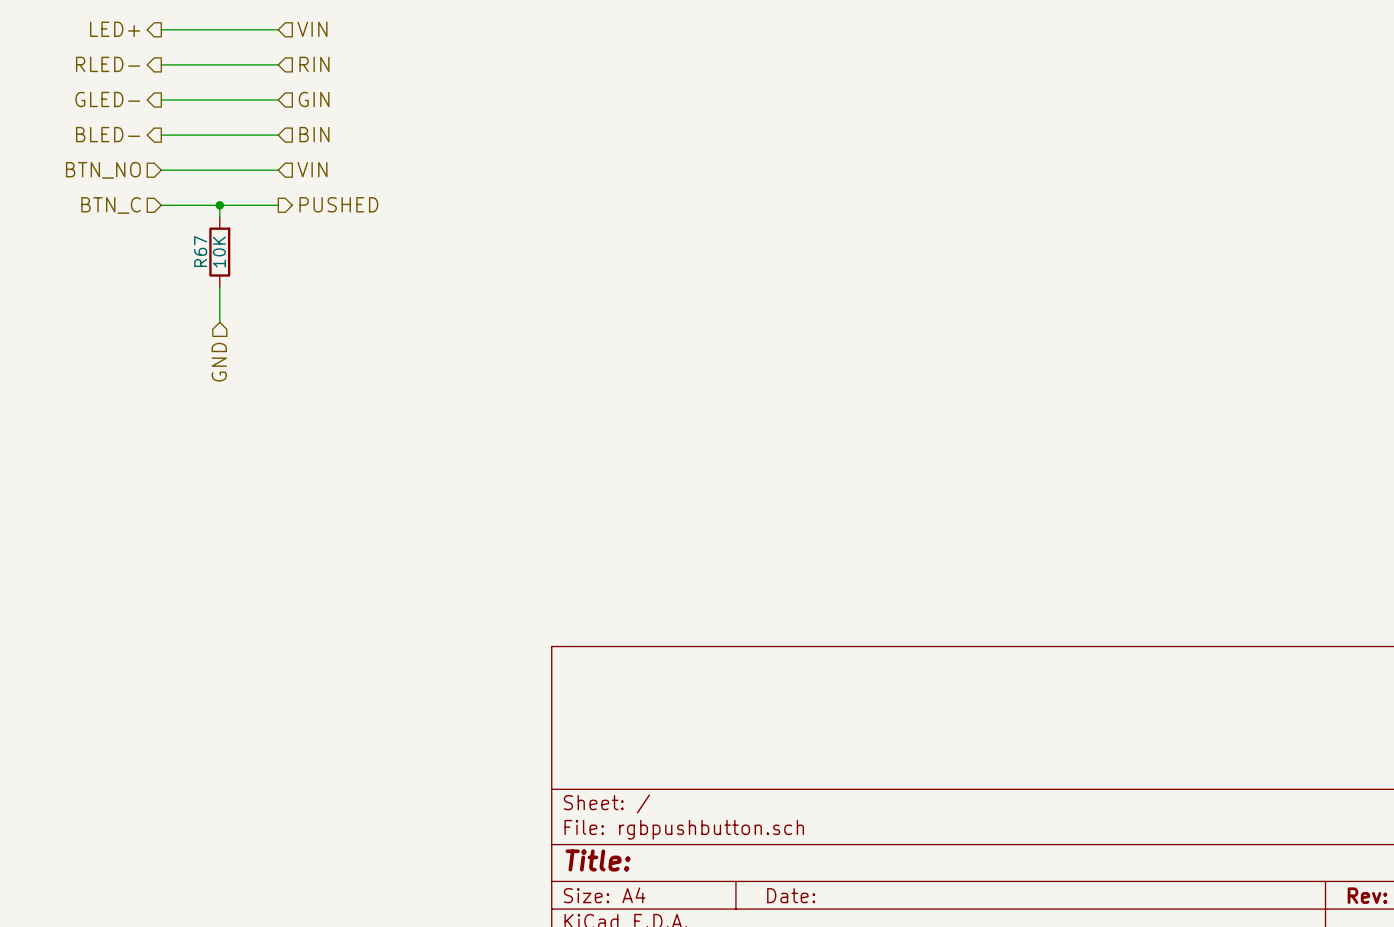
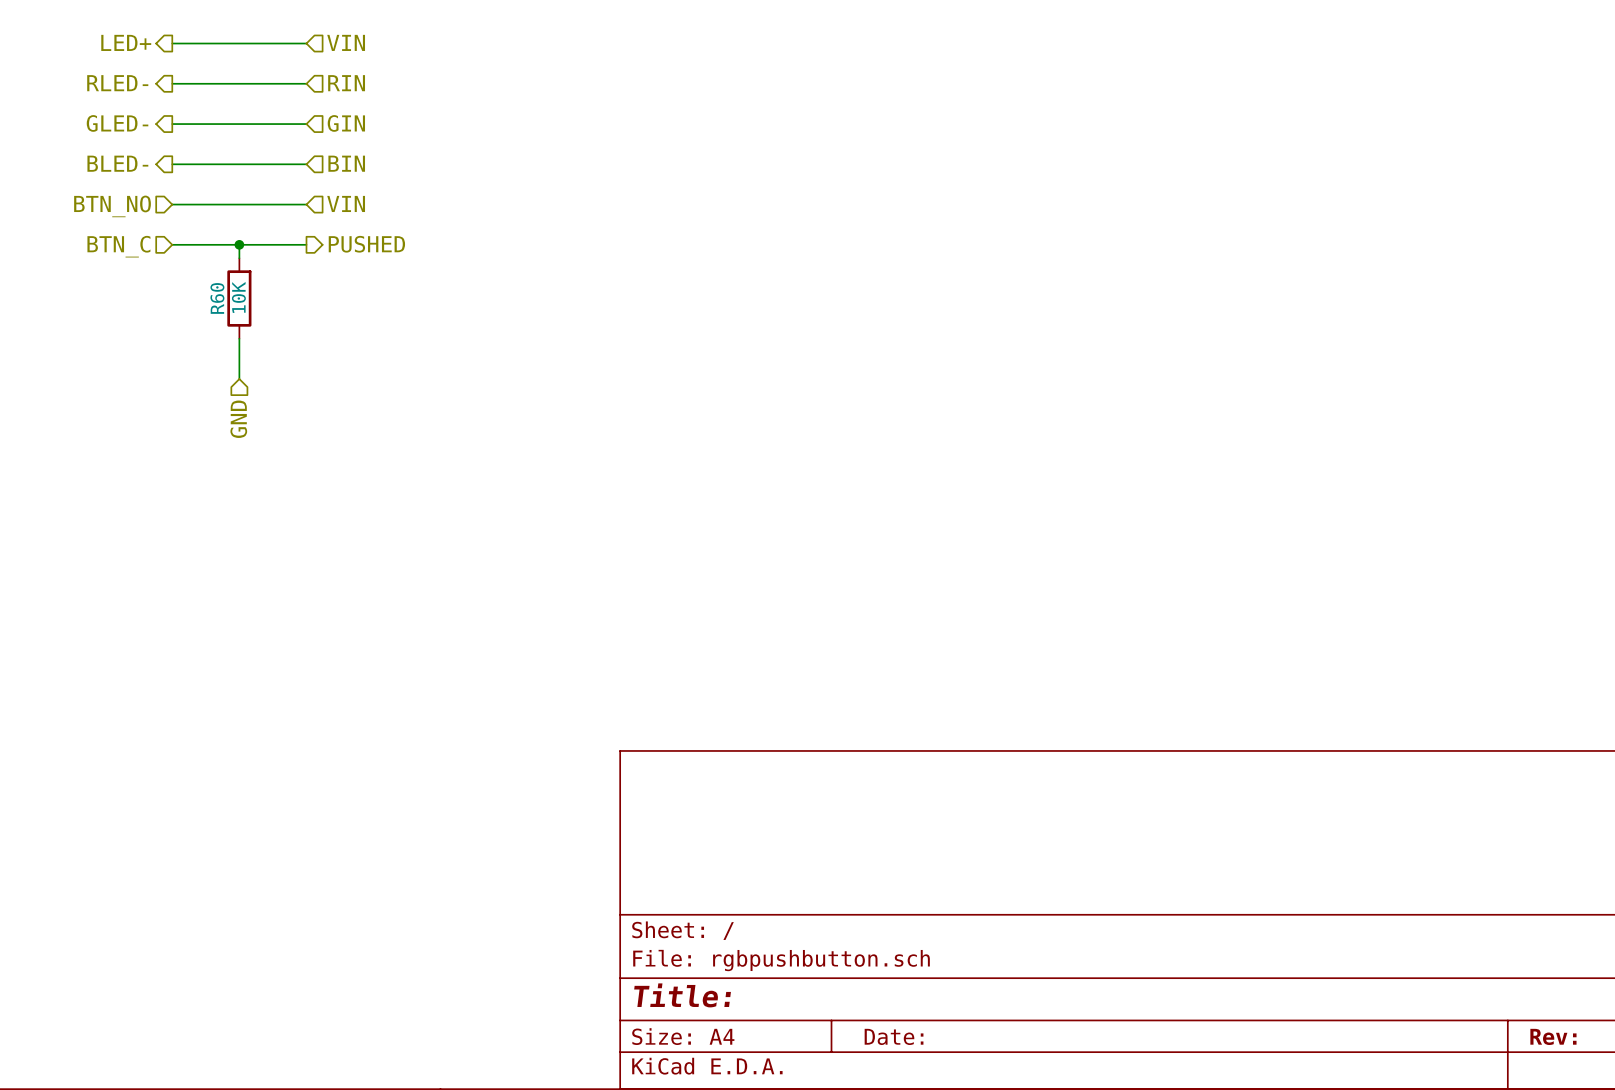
R67 name: R67 (200, 251) -> R60 (217, 298)

